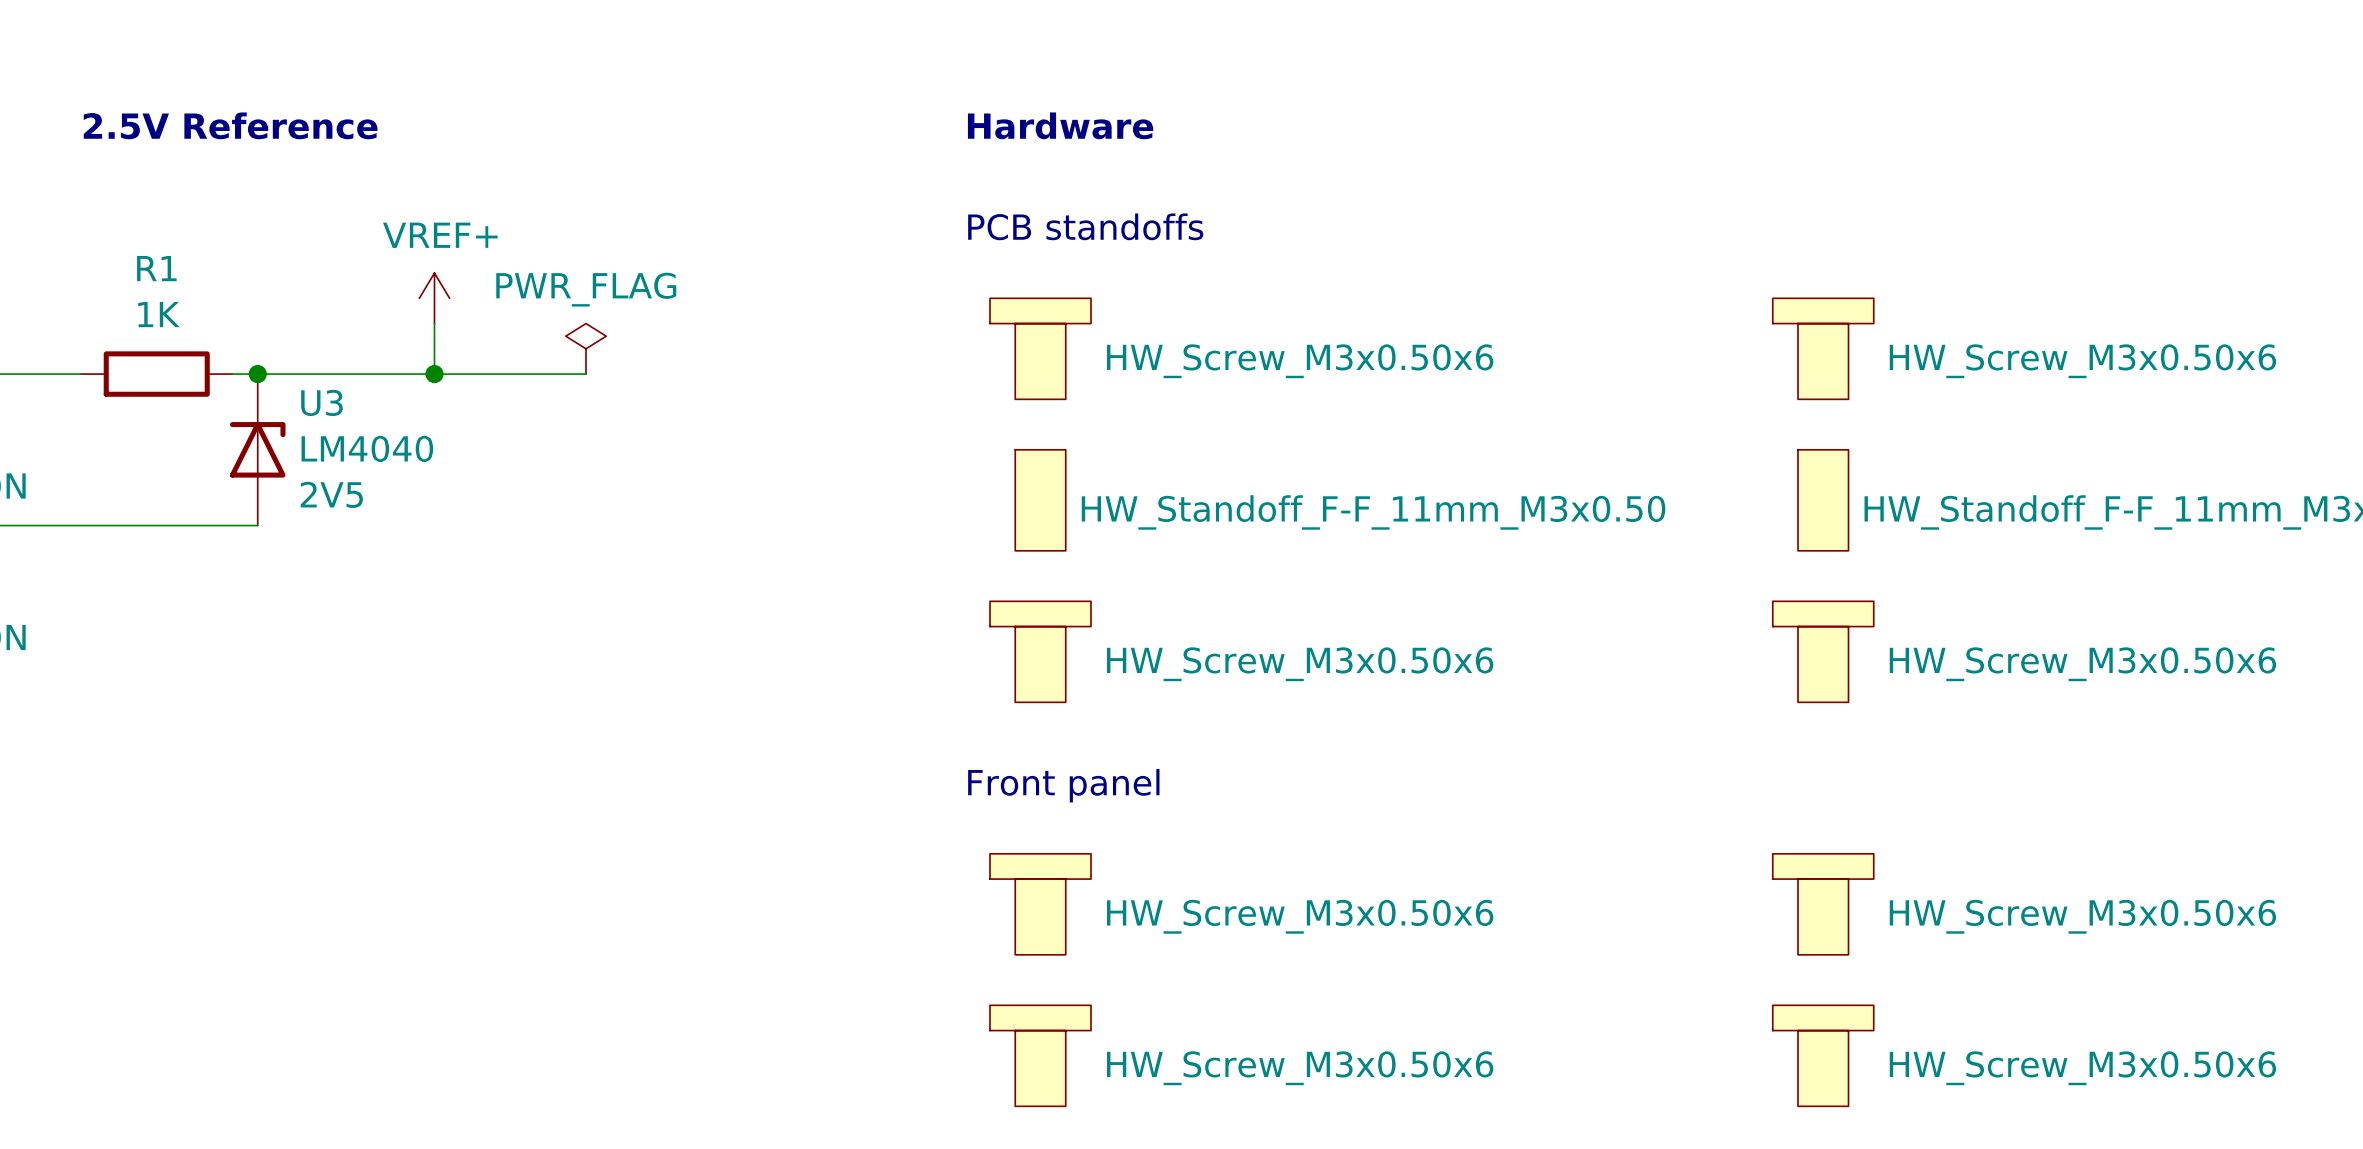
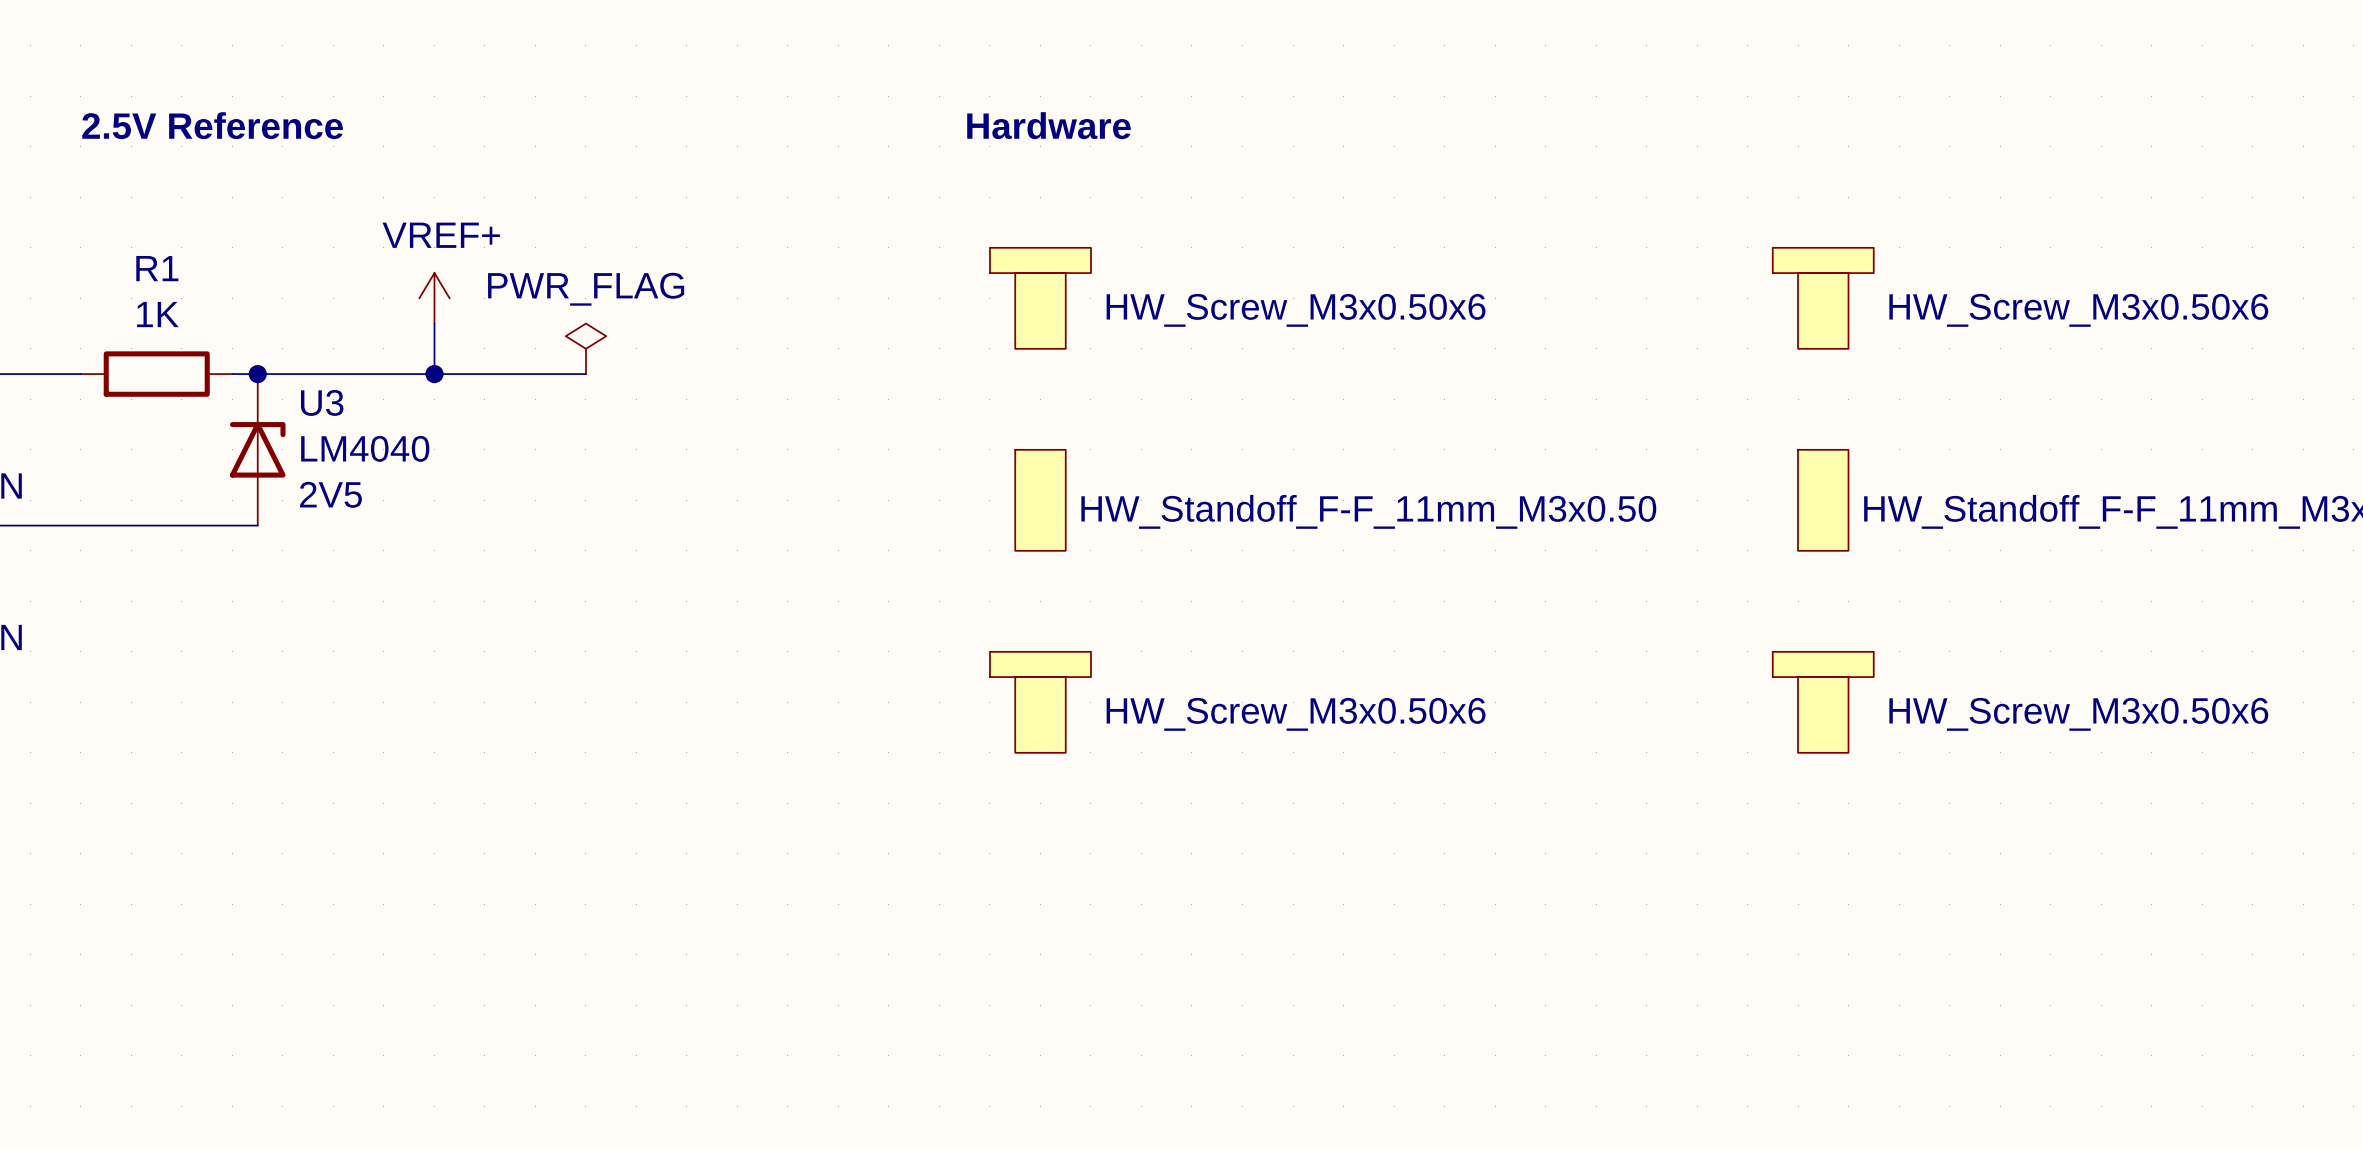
text: PCB standoffs (1085, 226) -> none
part position: (1040, 348) -> (1040, 298)
part position: (1823, 348) -> (1823, 298)
part position: (1040, 651) -> (1040, 702)
part position: (1823, 651) -> (1823, 702)
text: Front panel (1063, 785) -> none
part: HW_Screw_M3x0.50x6 (1040, 904) -> none
part: HW_Screw_M3x0.50x6 (1823, 904) -> none
part: HW_Screw_M3x0.50x6 (1040, 1055) -> none
part: HW_Screw_M3x0.50x6 (1823, 1055) -> none

